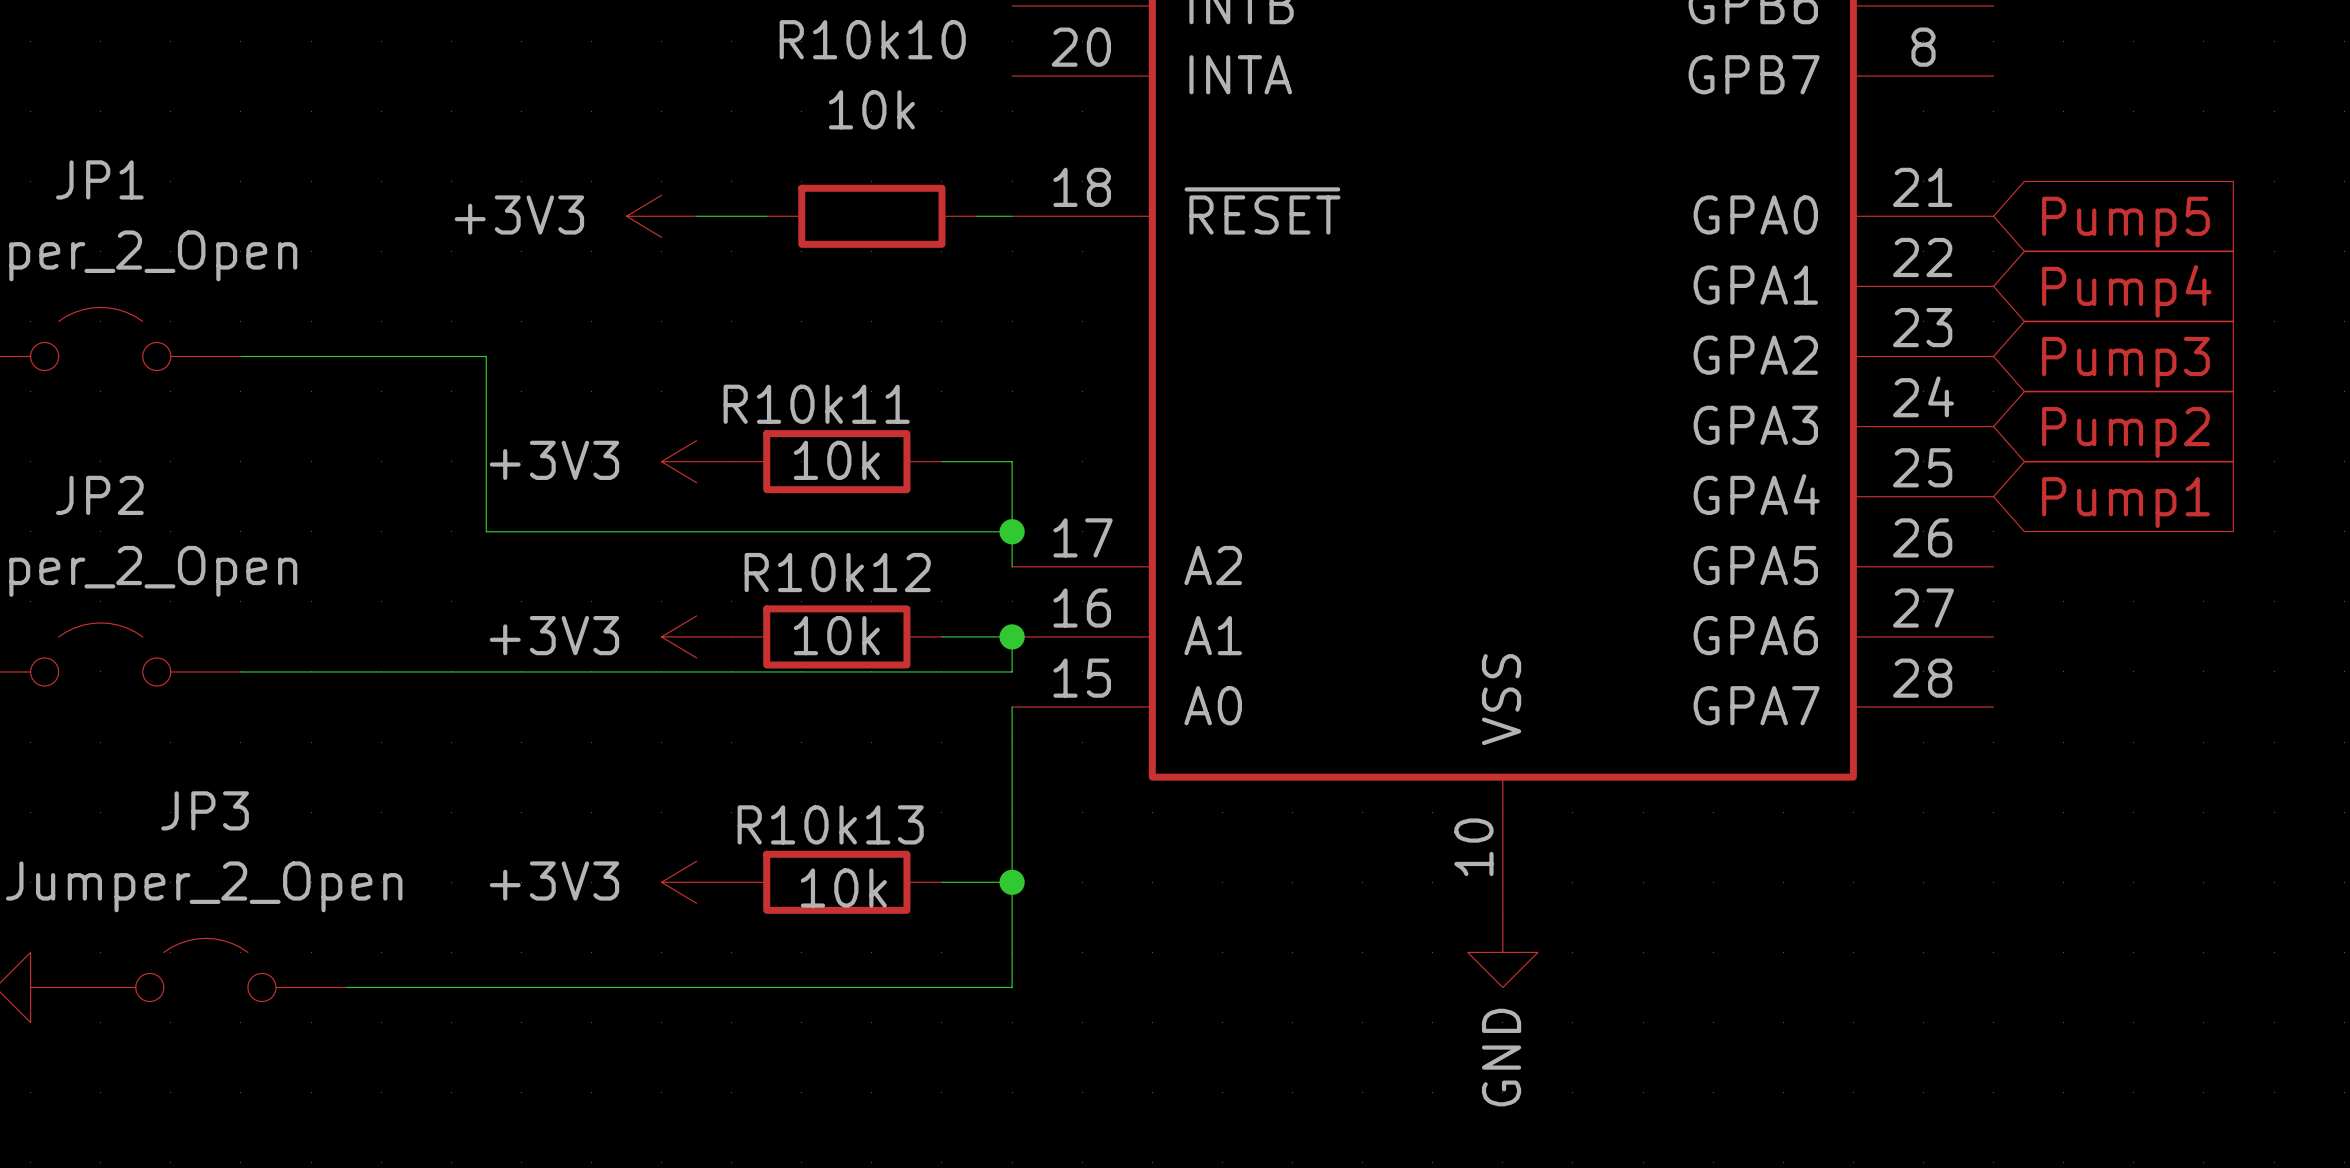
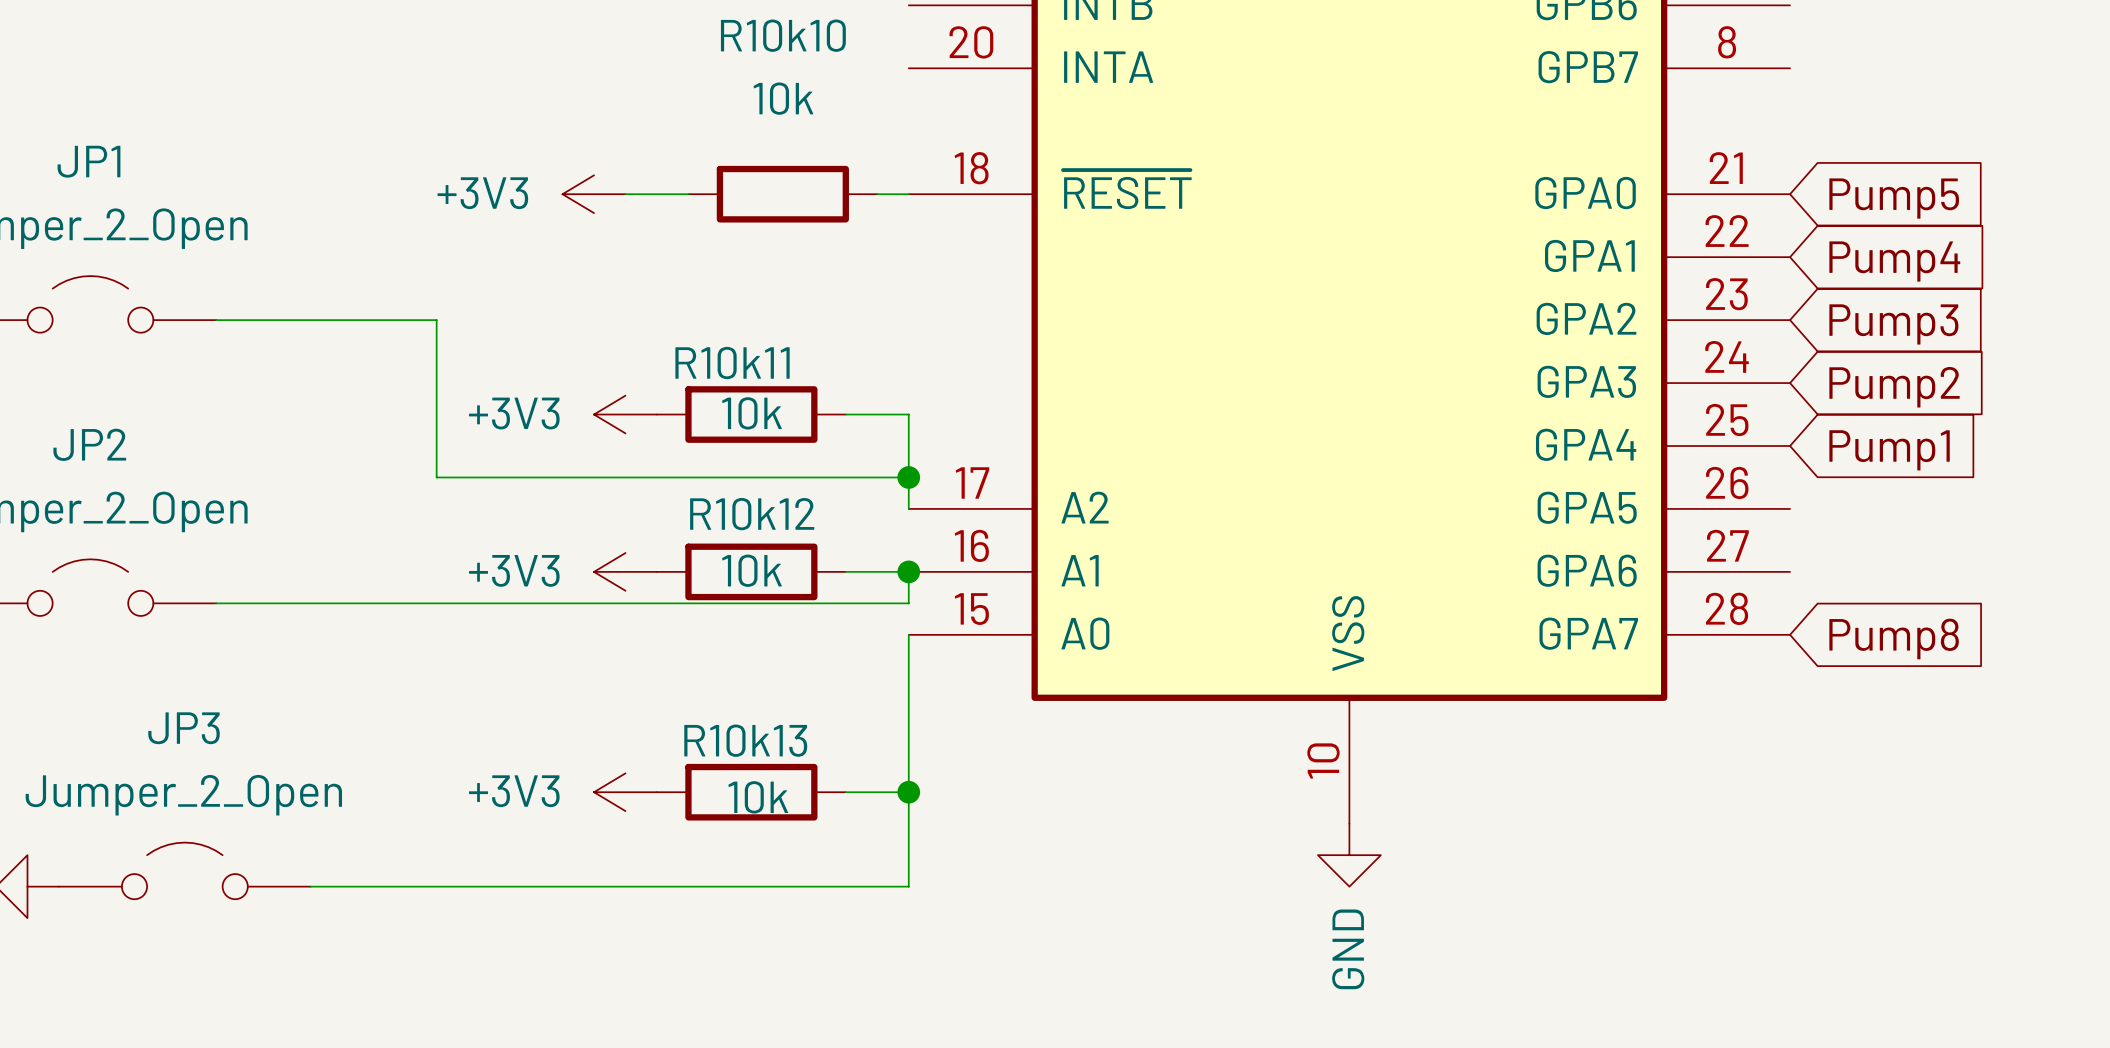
global label: none -> Pump8 (1894, 638)

